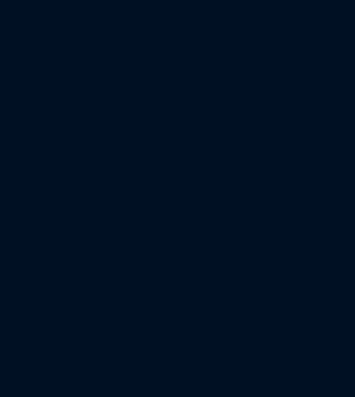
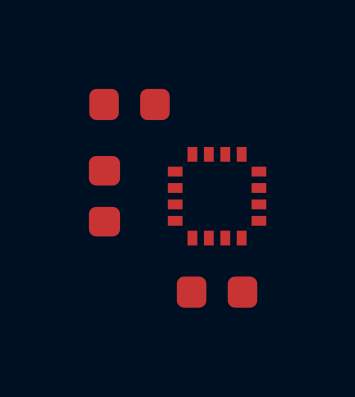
part: none -> (129, 104)
part: none -> (104, 196)
part: none -> (217, 196)
part: none -> (217, 292)

